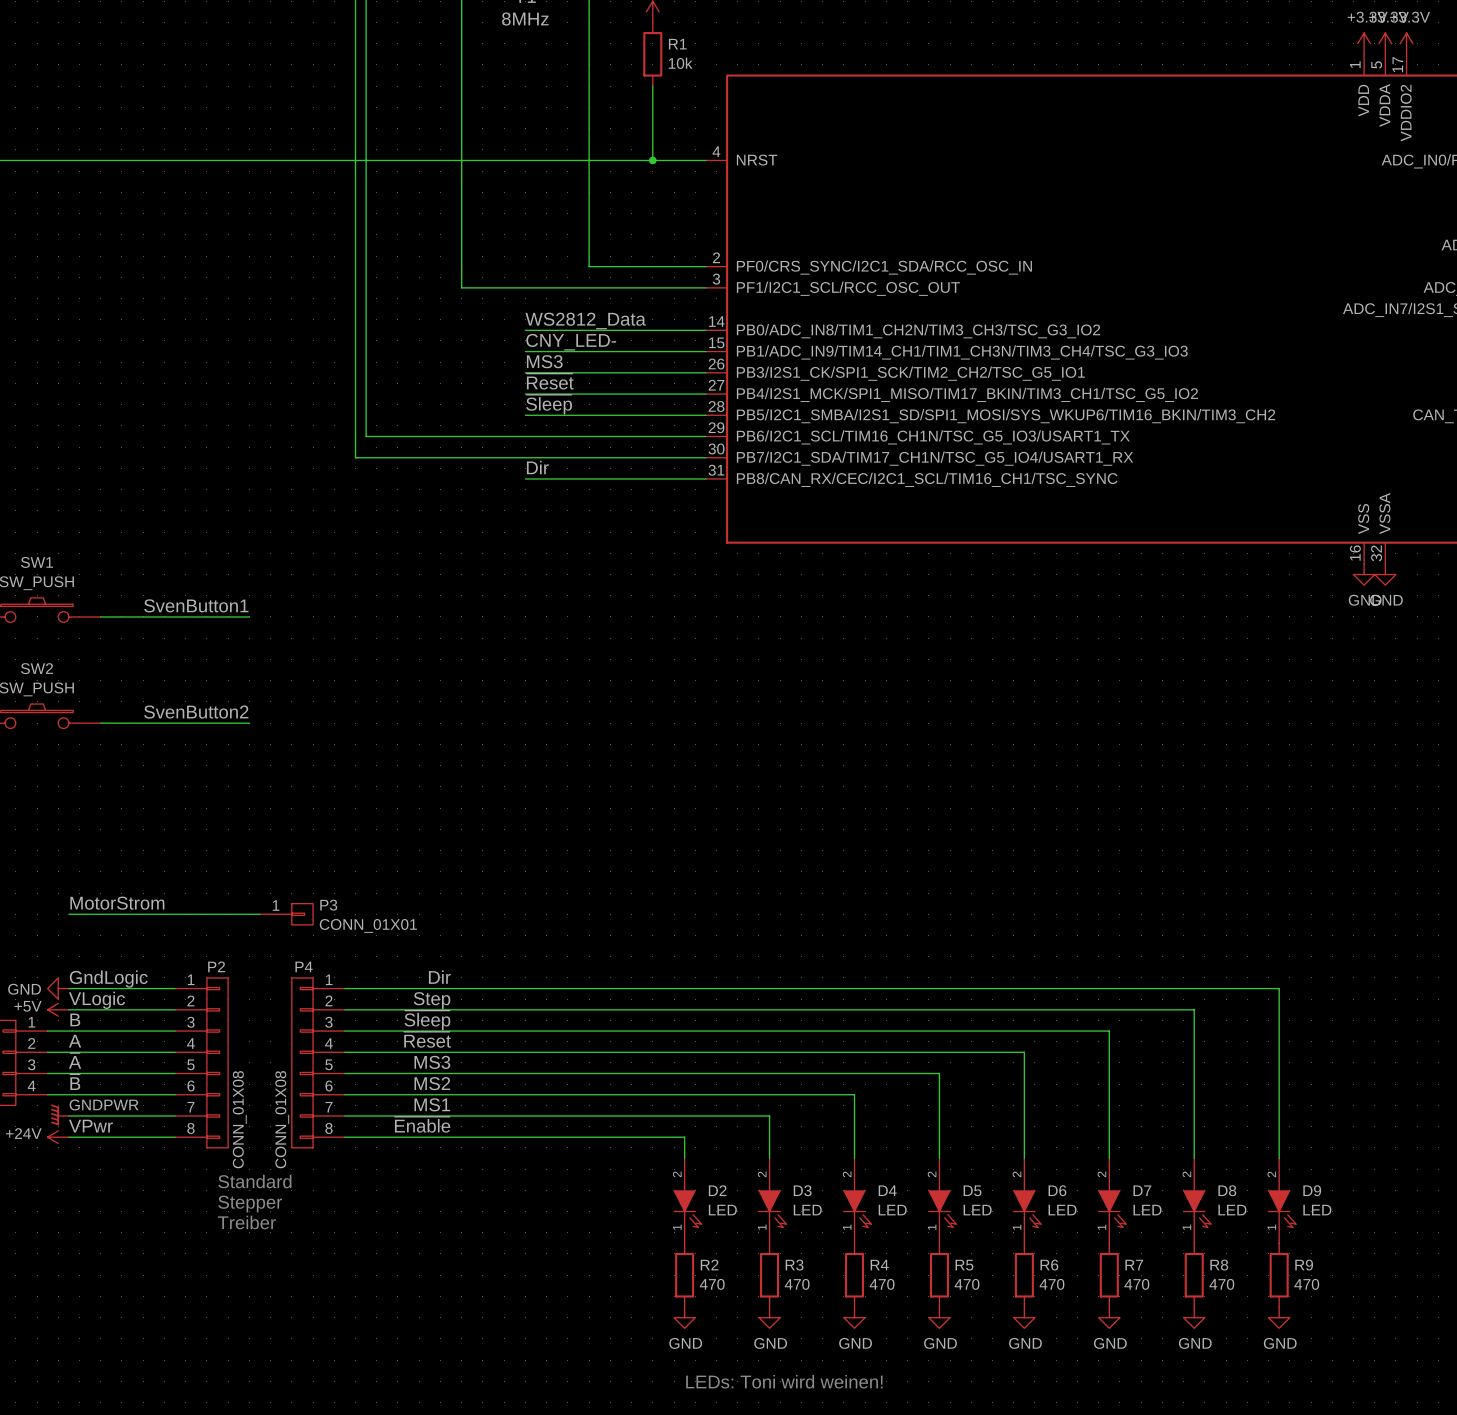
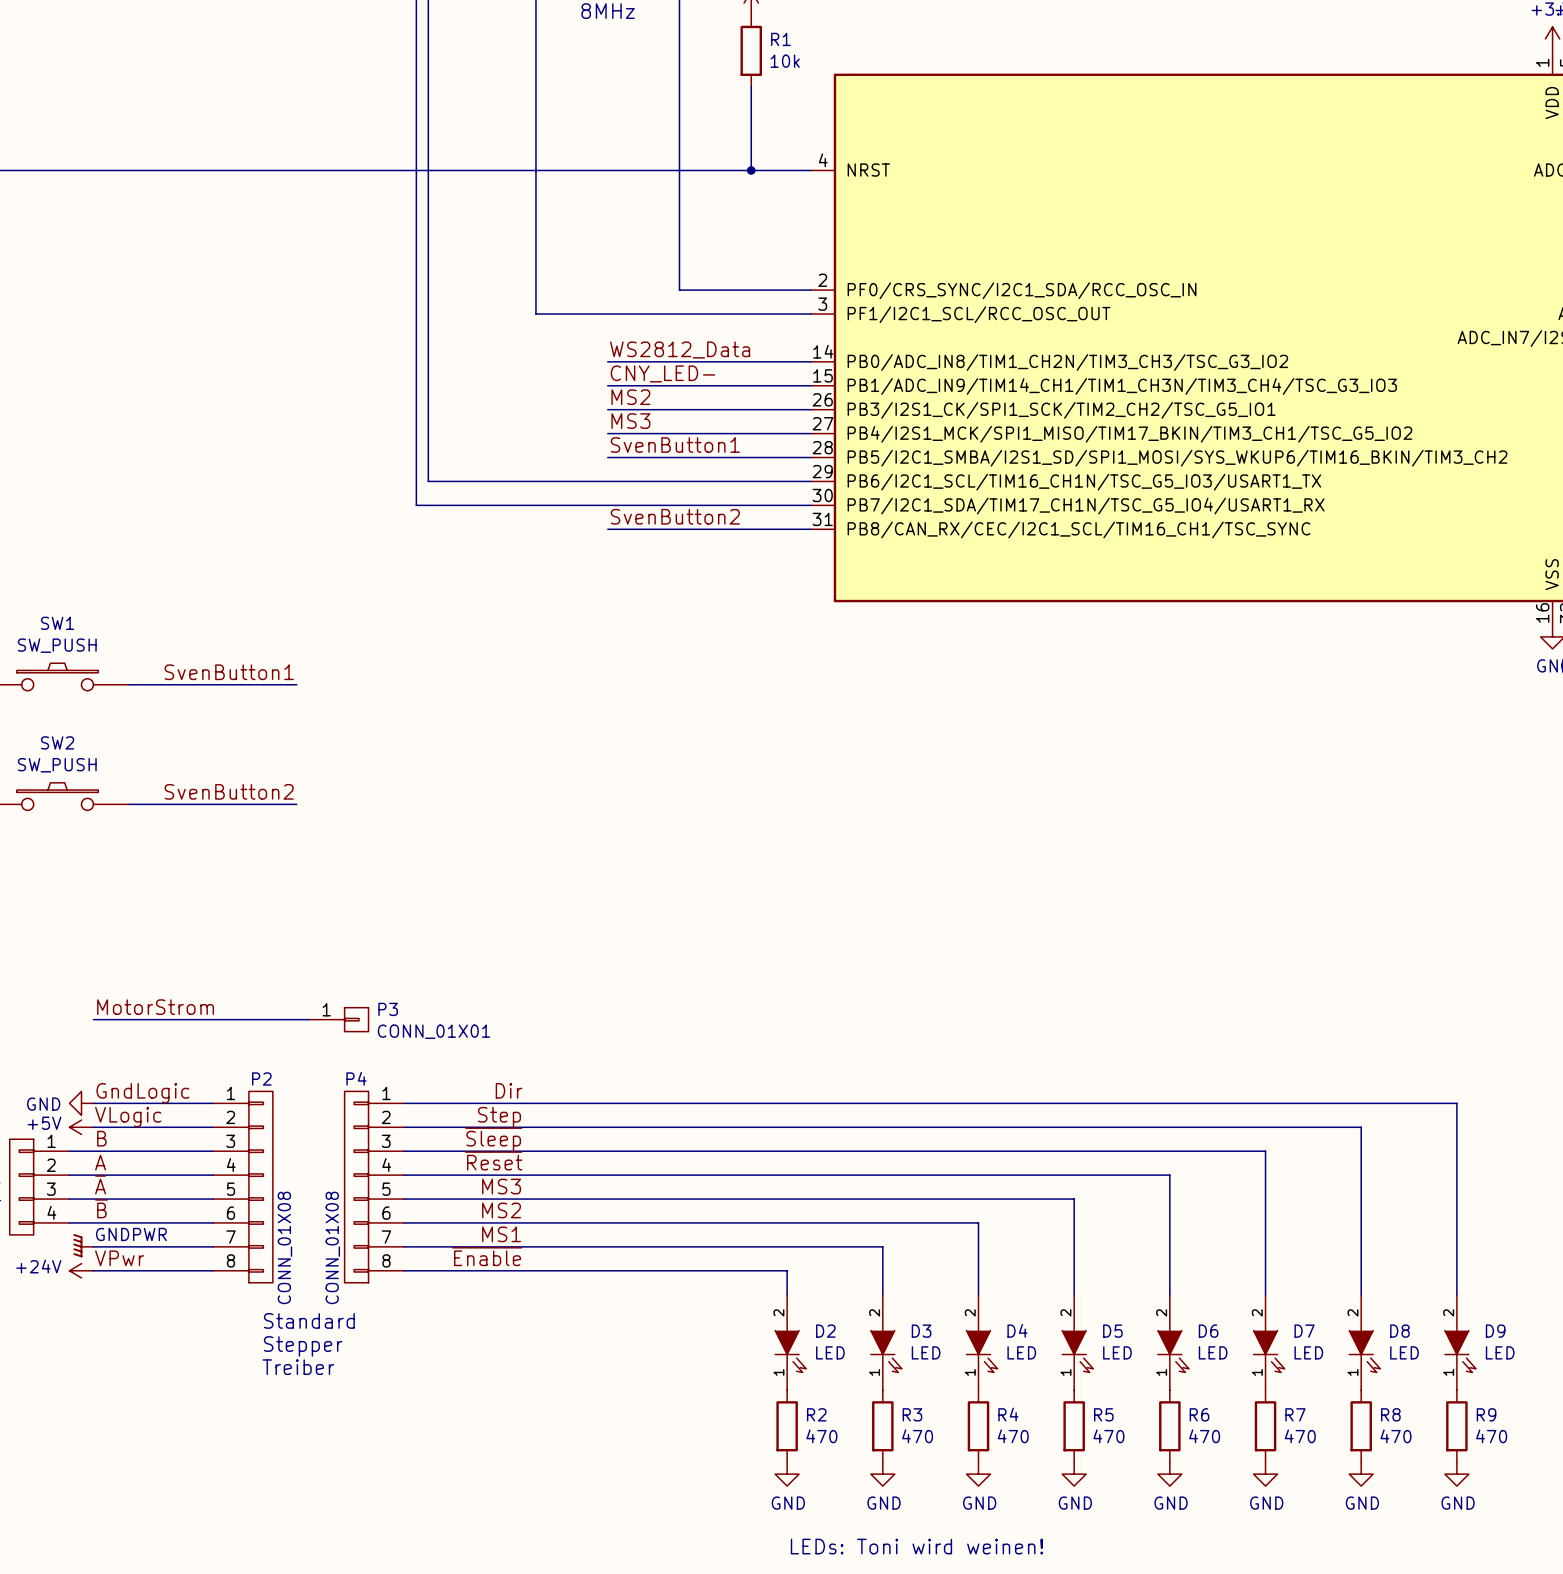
label: MS3 (544, 361) -> MS2 (630, 397)
label: ~{Reset} (550, 381) -> MS3 (630, 421)
label: ~{Sleep} (549, 404) -> SvenButton1 (675, 445)
label: Dir (537, 467) -> SvenButton2 (675, 516)

